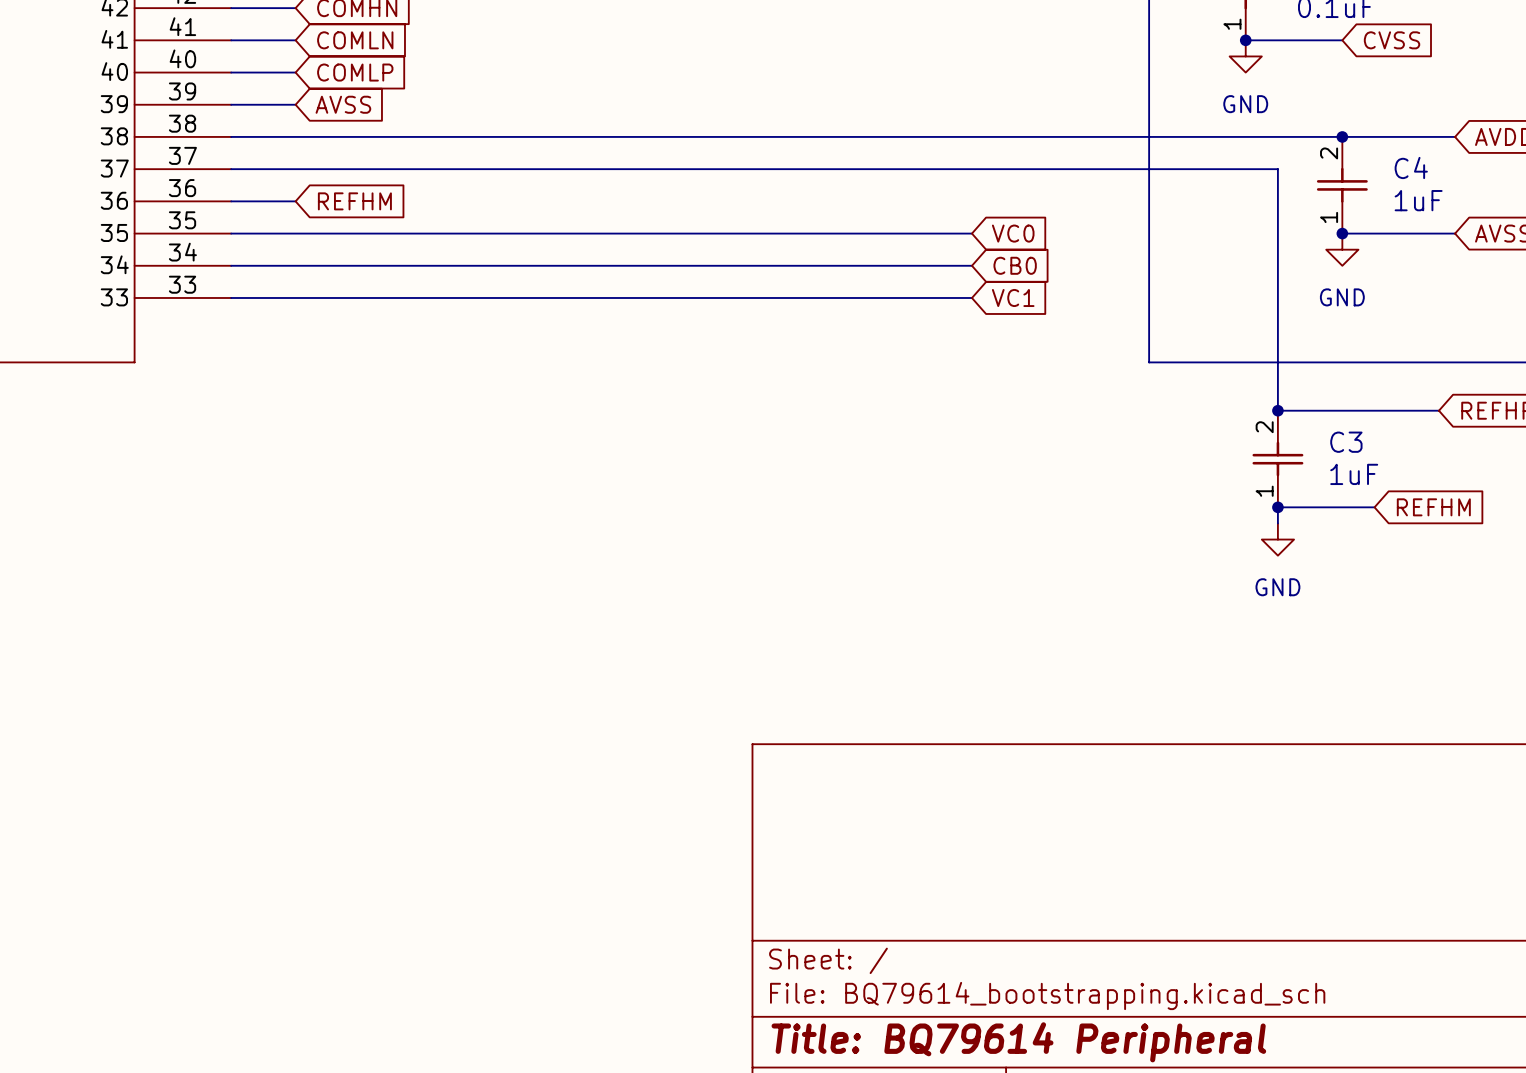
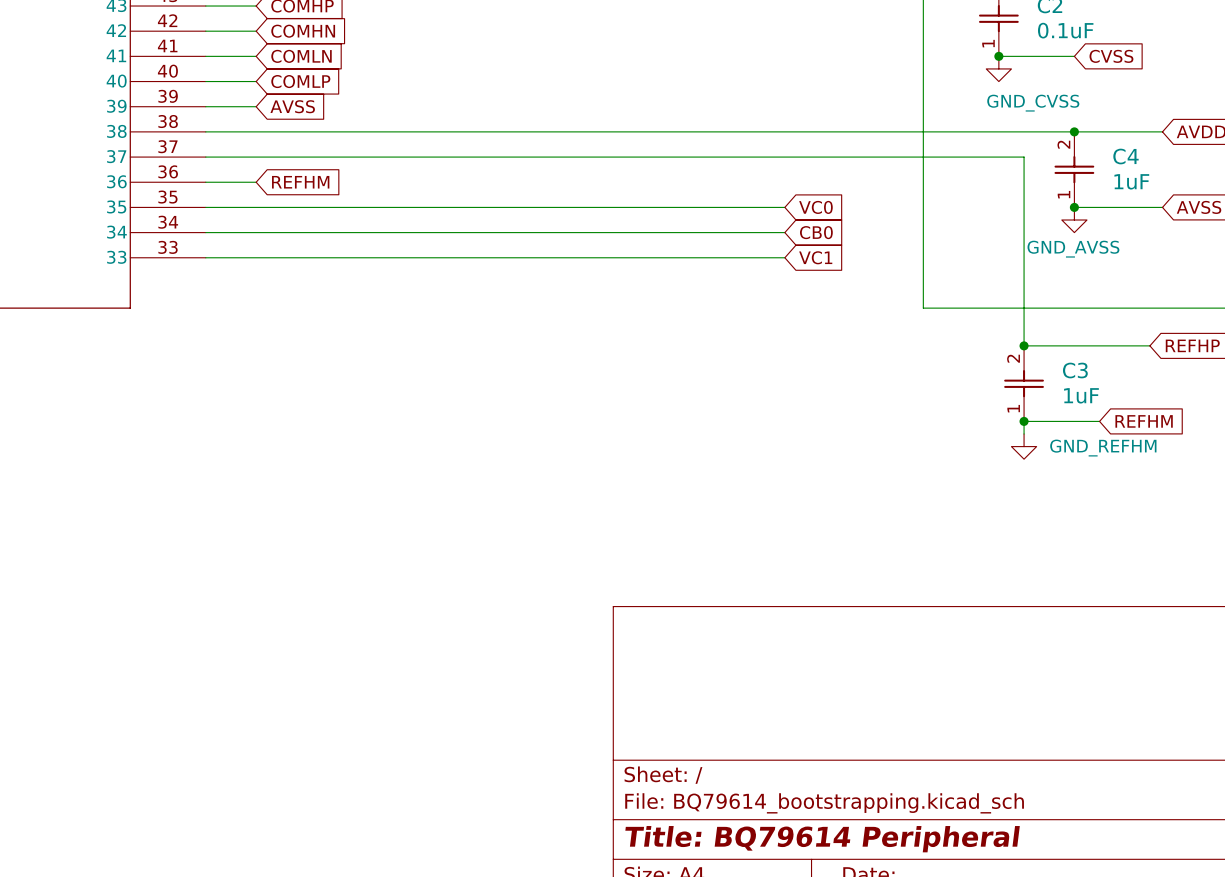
power symbol: GND (1245, 56) -> GND_CVSS (998, 68)
power symbol: GND (1342, 249) -> GND_AVSS (1074, 220)
power symbol: GND (1277, 539) -> GND_REFHM (1024, 446)

